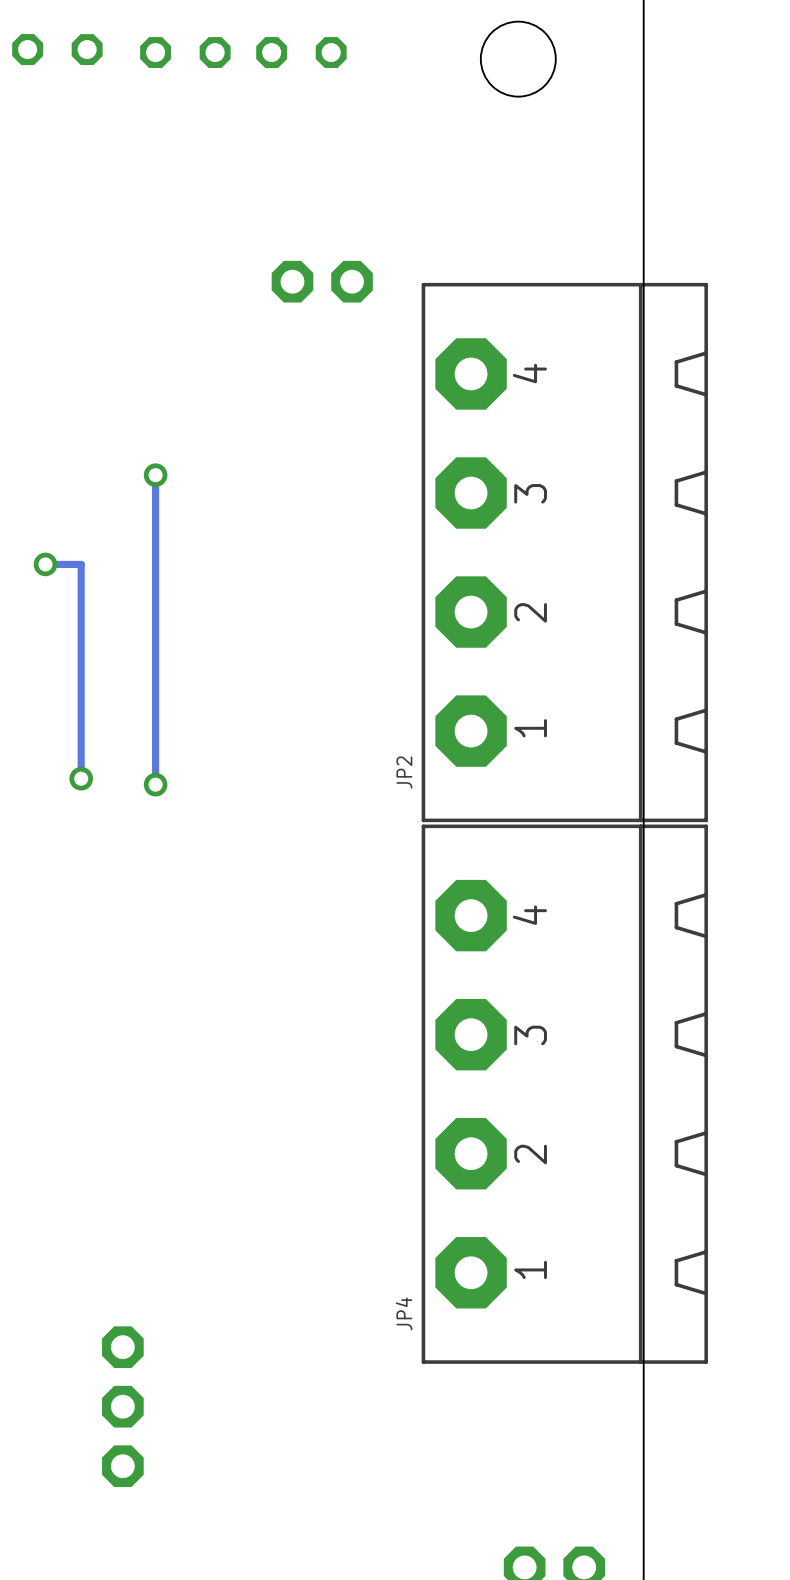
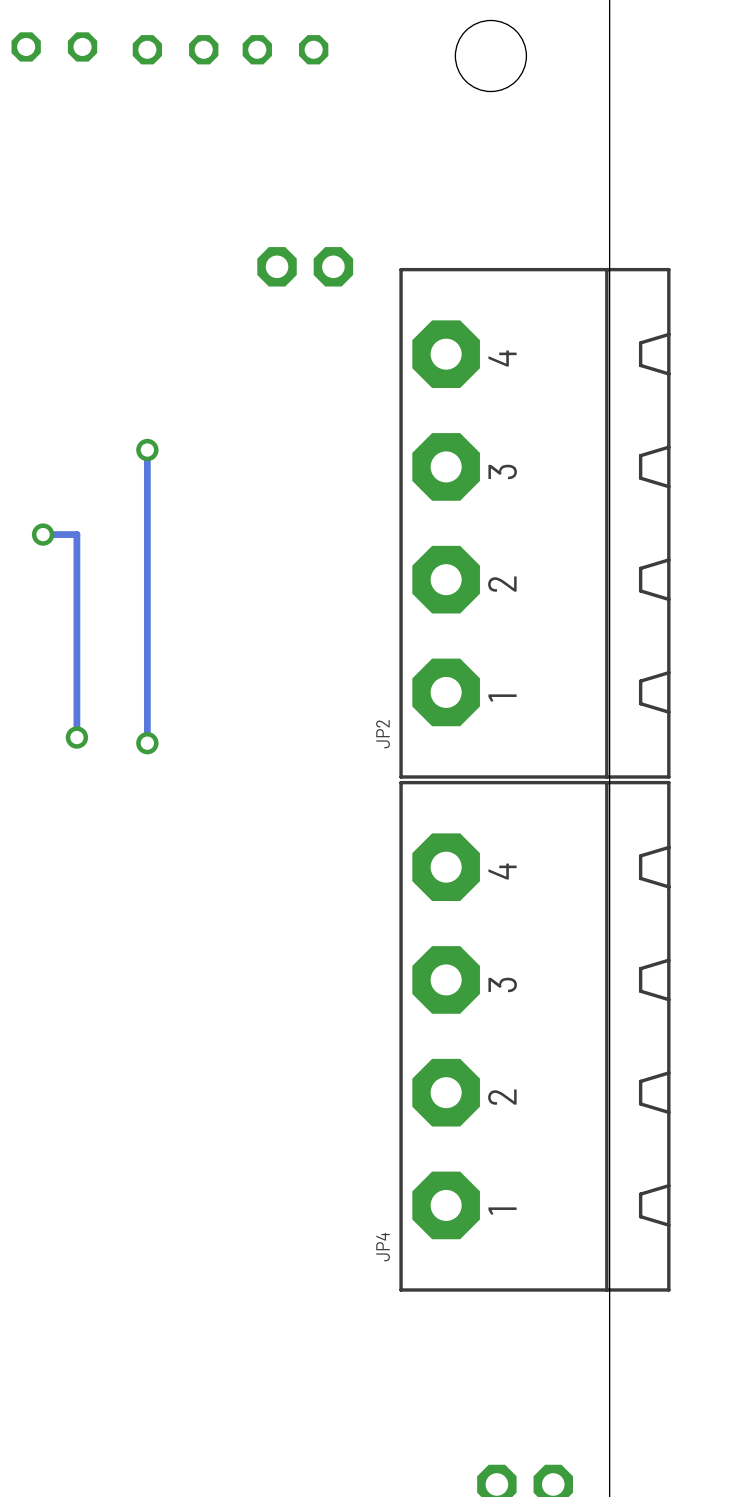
part: (122, 1406) -> none

